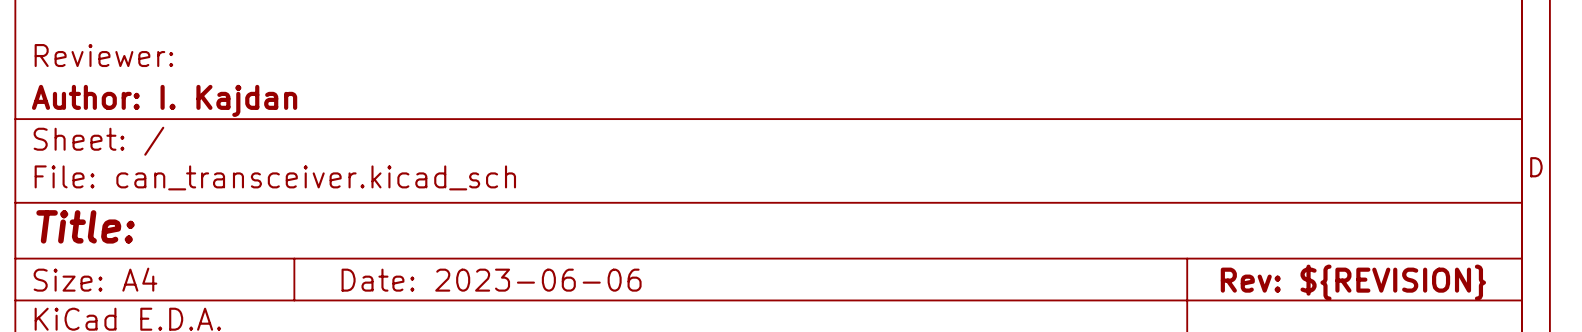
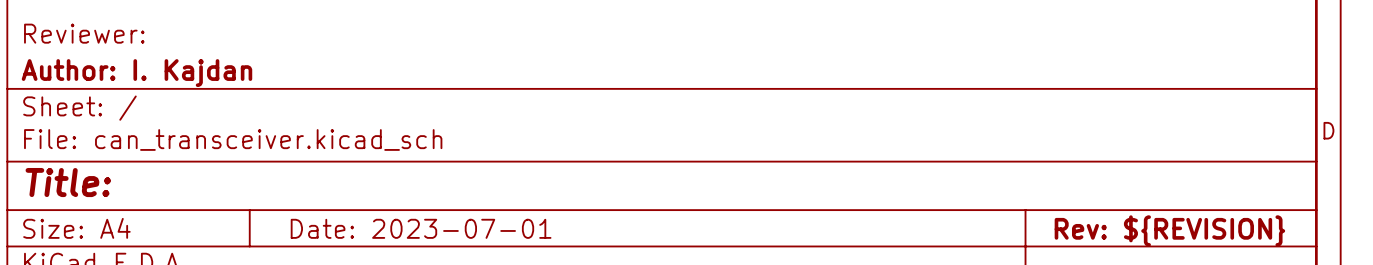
title block: Date: 2023-06-06 (491, 280) -> Date: 2023-07-01 (421, 228)

